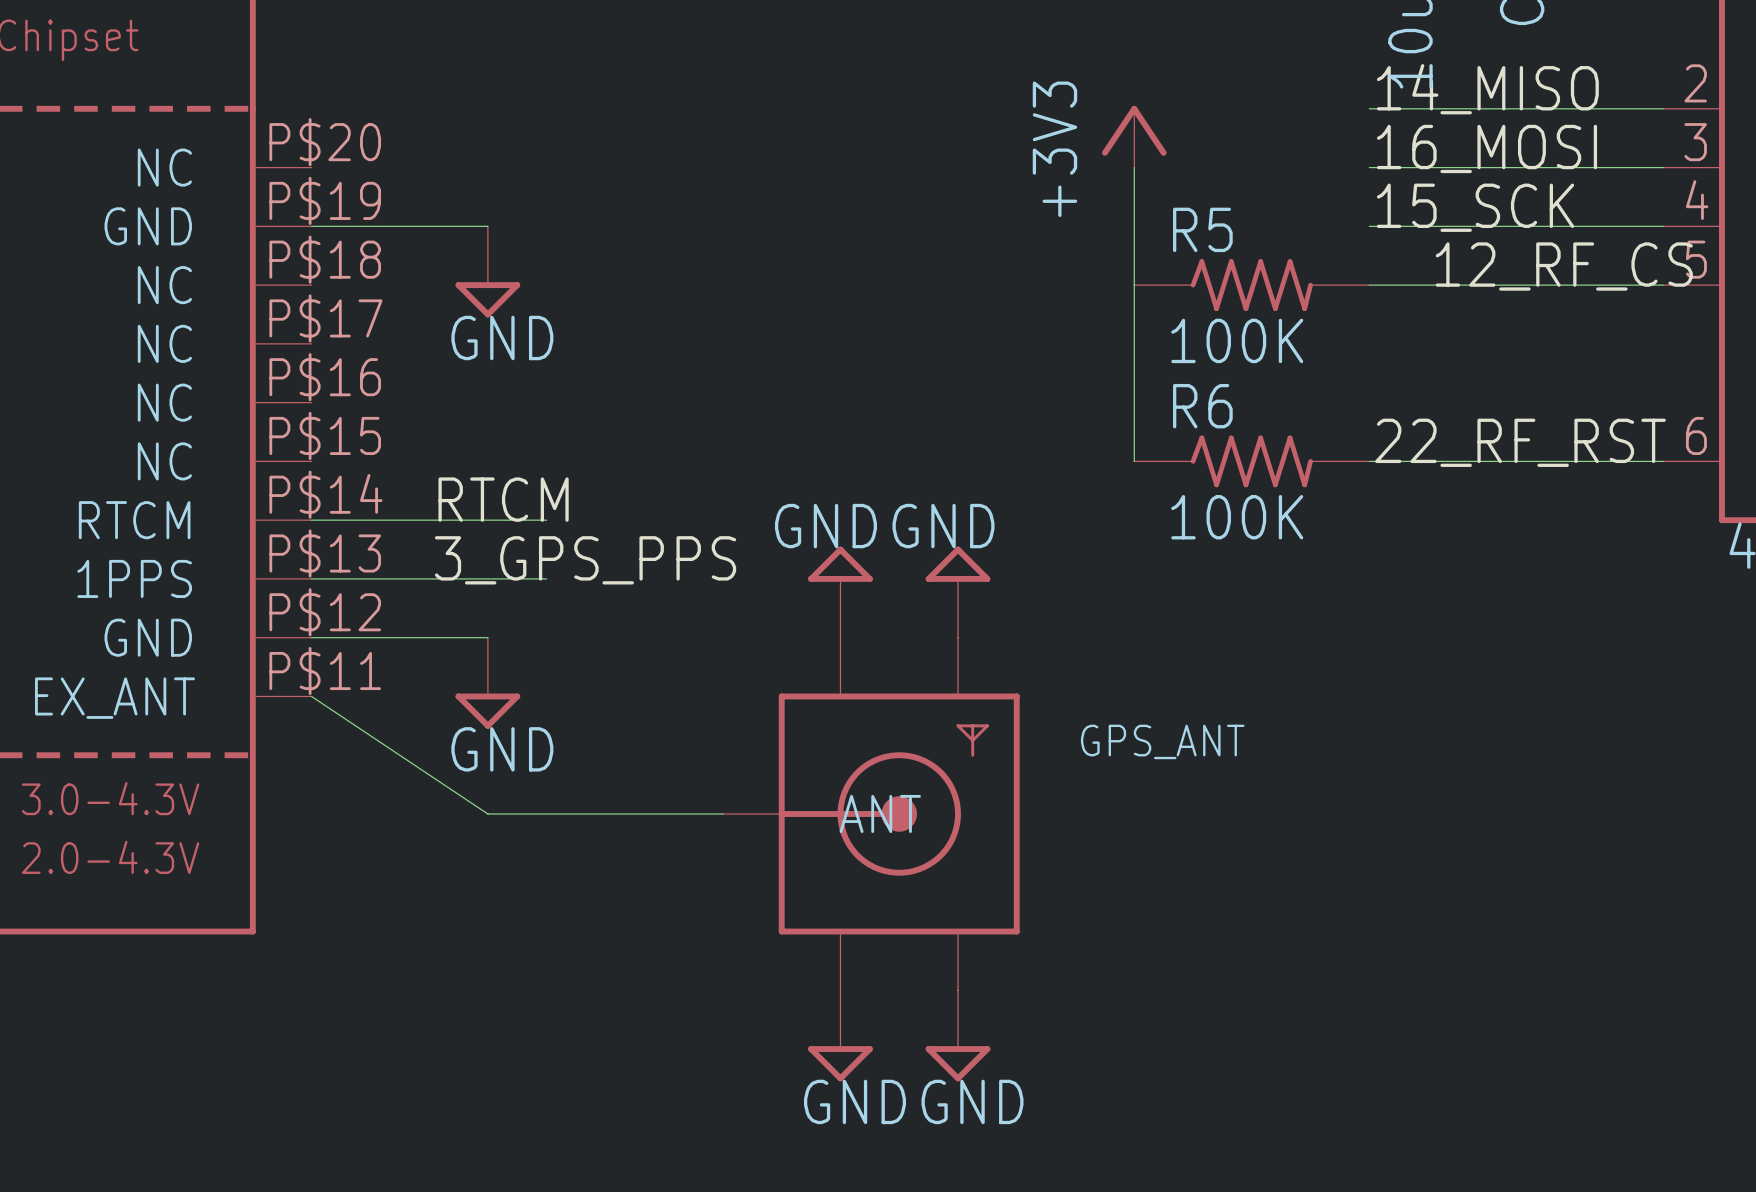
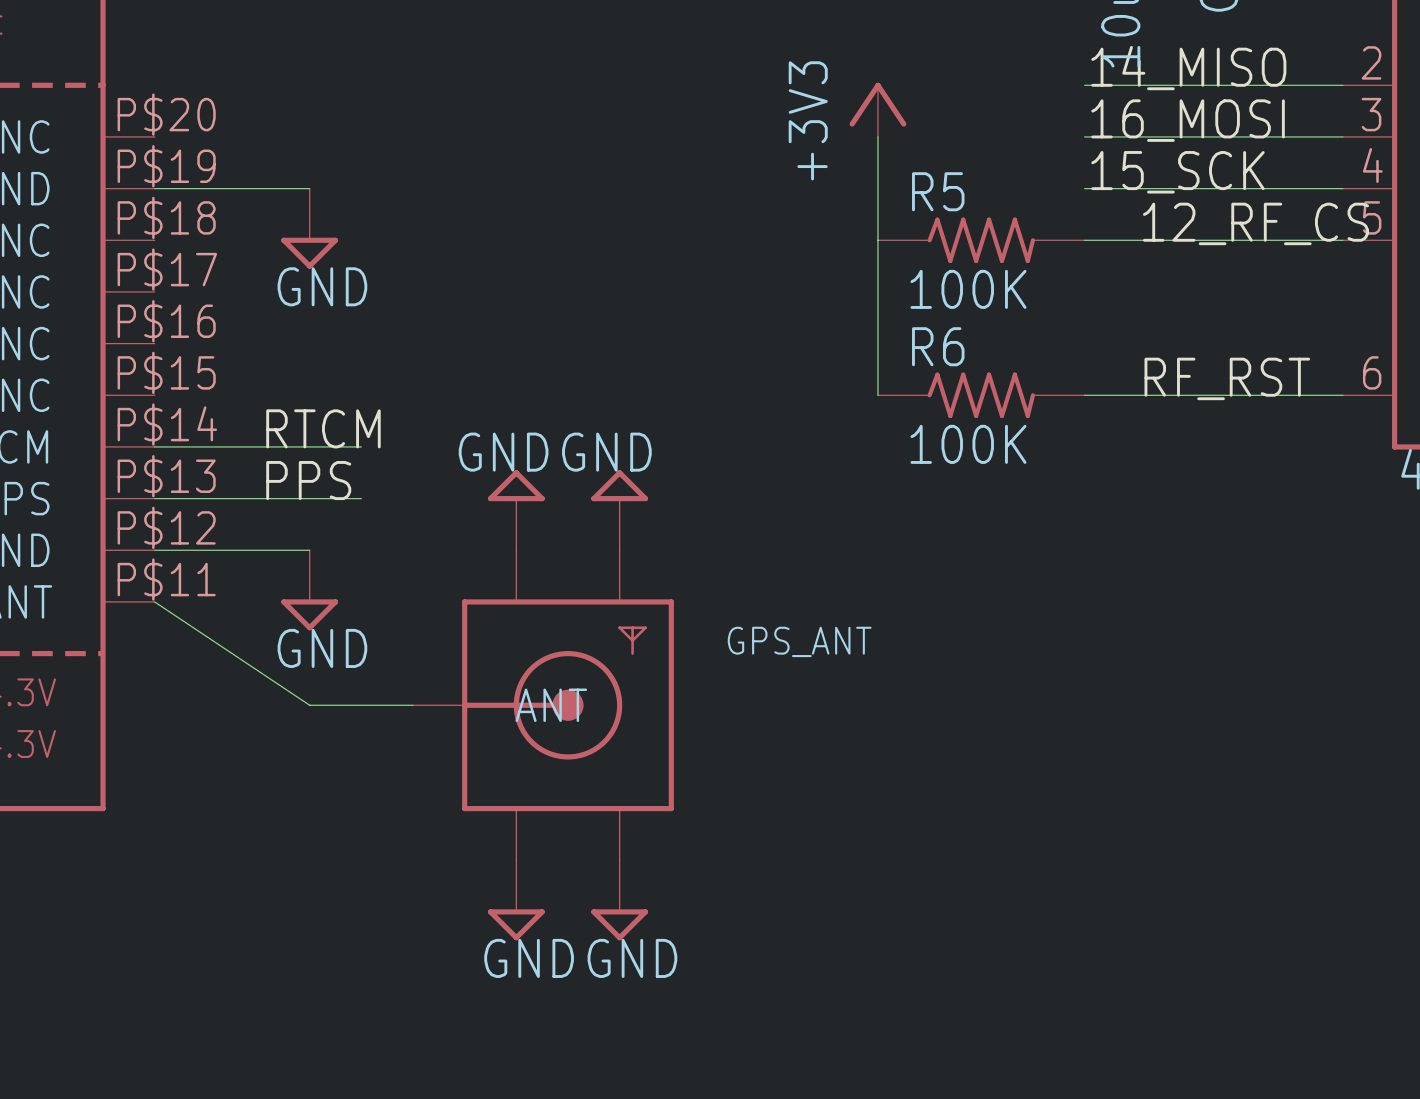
label: 22_RF_RST (1520, 442) -> RF_RST (1227, 378)
label: 3_GPS_PPS (585, 560) -> PPS (308, 480)
power symbol position: GND (958, 592) -> GND (516, 510)
GPS_ANT position: (871, 813) -> (543, 705)
power symbol position: GND (958, 1035) -> GND (516, 900)

